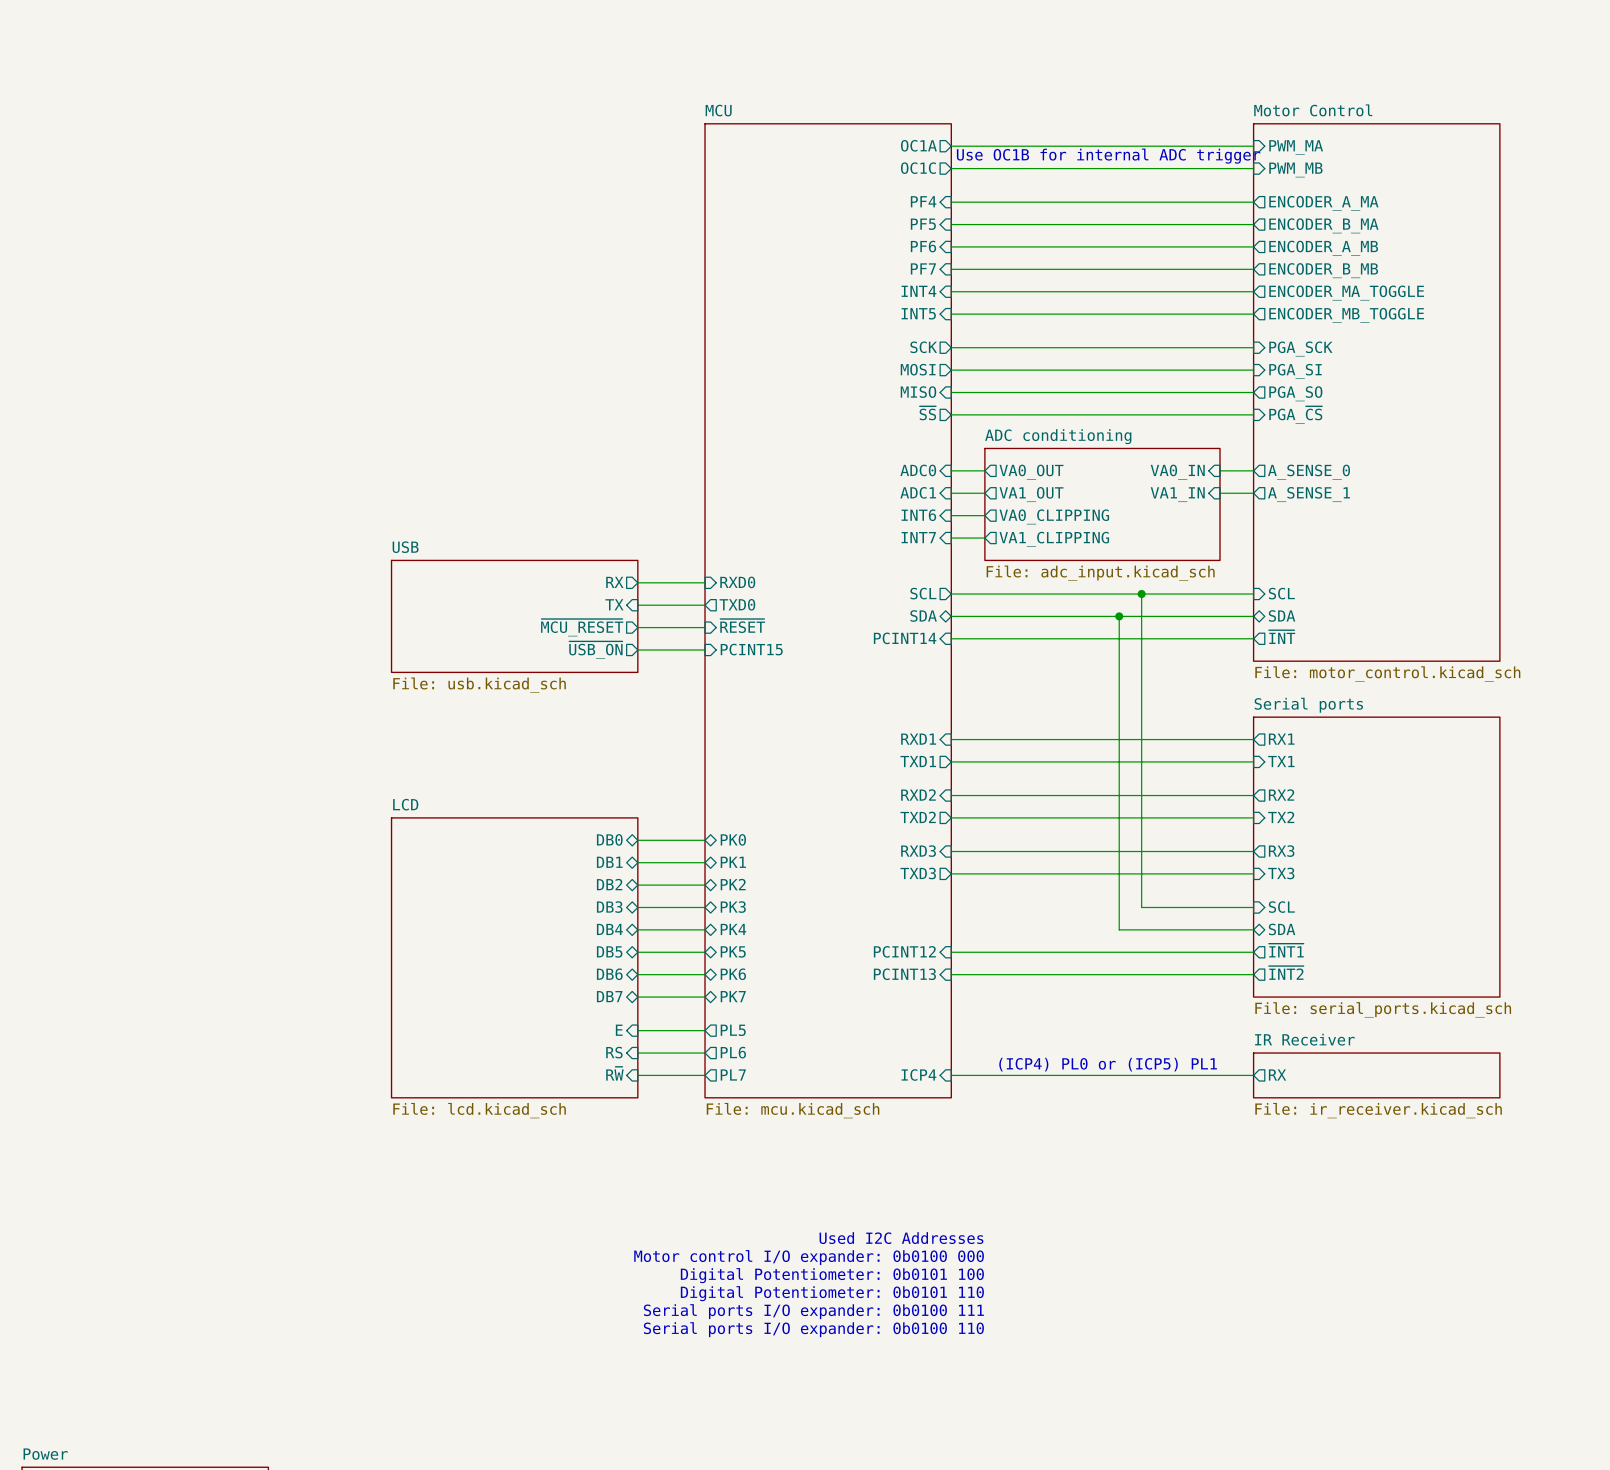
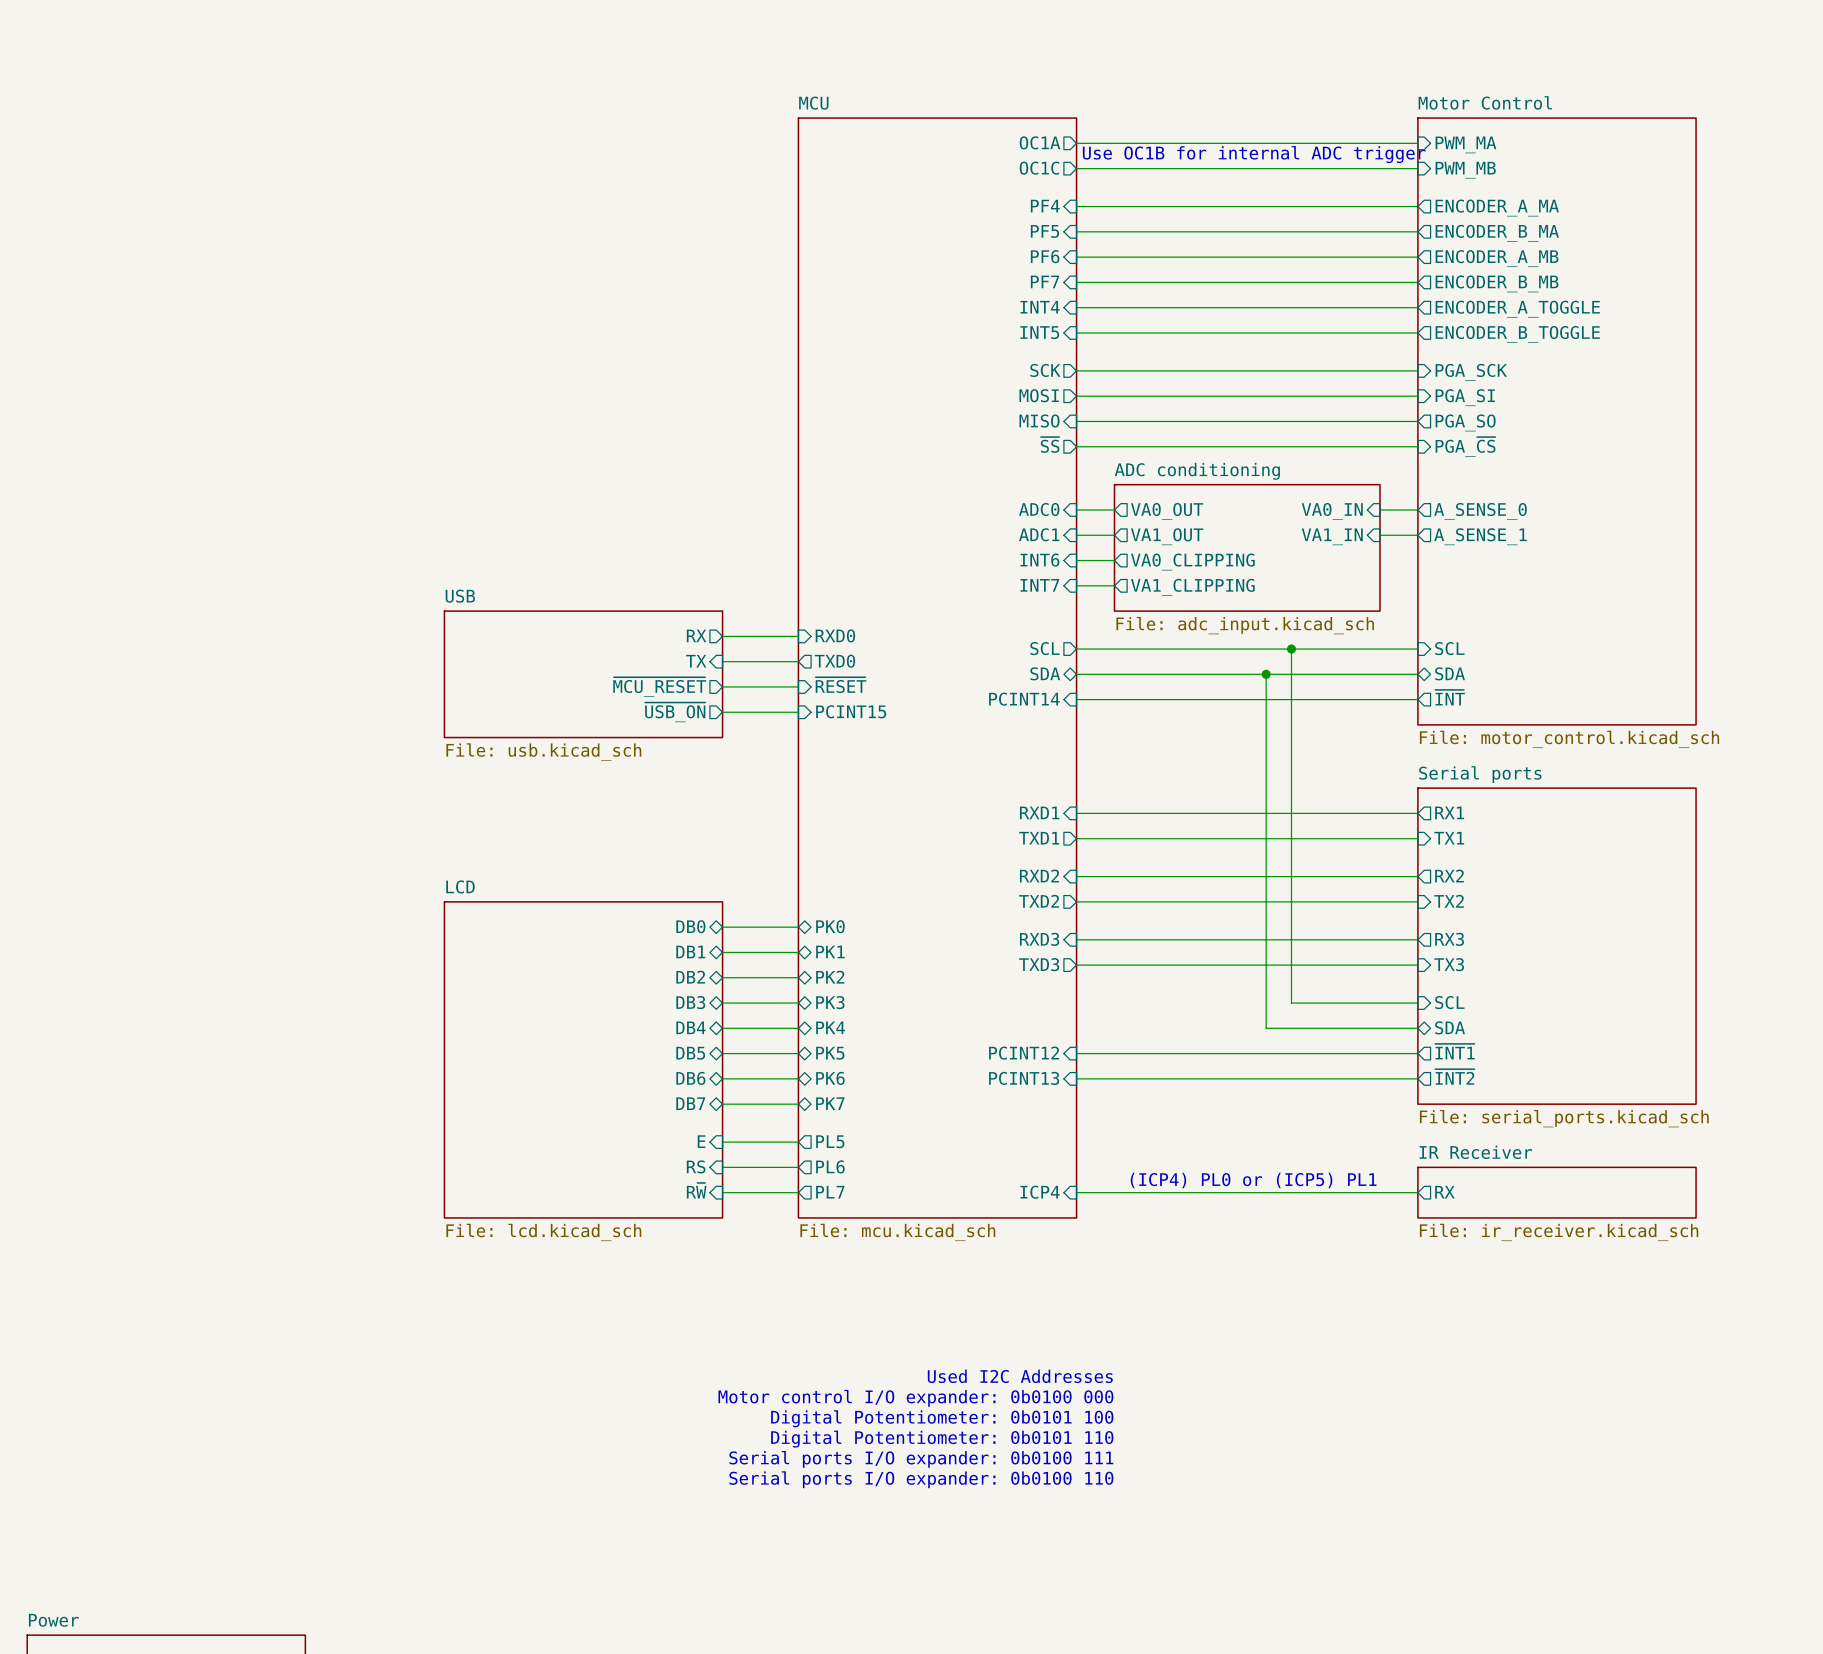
sheet pin: ENCODER_MA_TOGGLE (1346, 293) -> ENCODER_A_TOGGLE (1517, 309)
sheet pin: ENCODER_MB_TOGGLE (1346, 315) -> ENCODER_B_TOGGLE (1517, 334)

